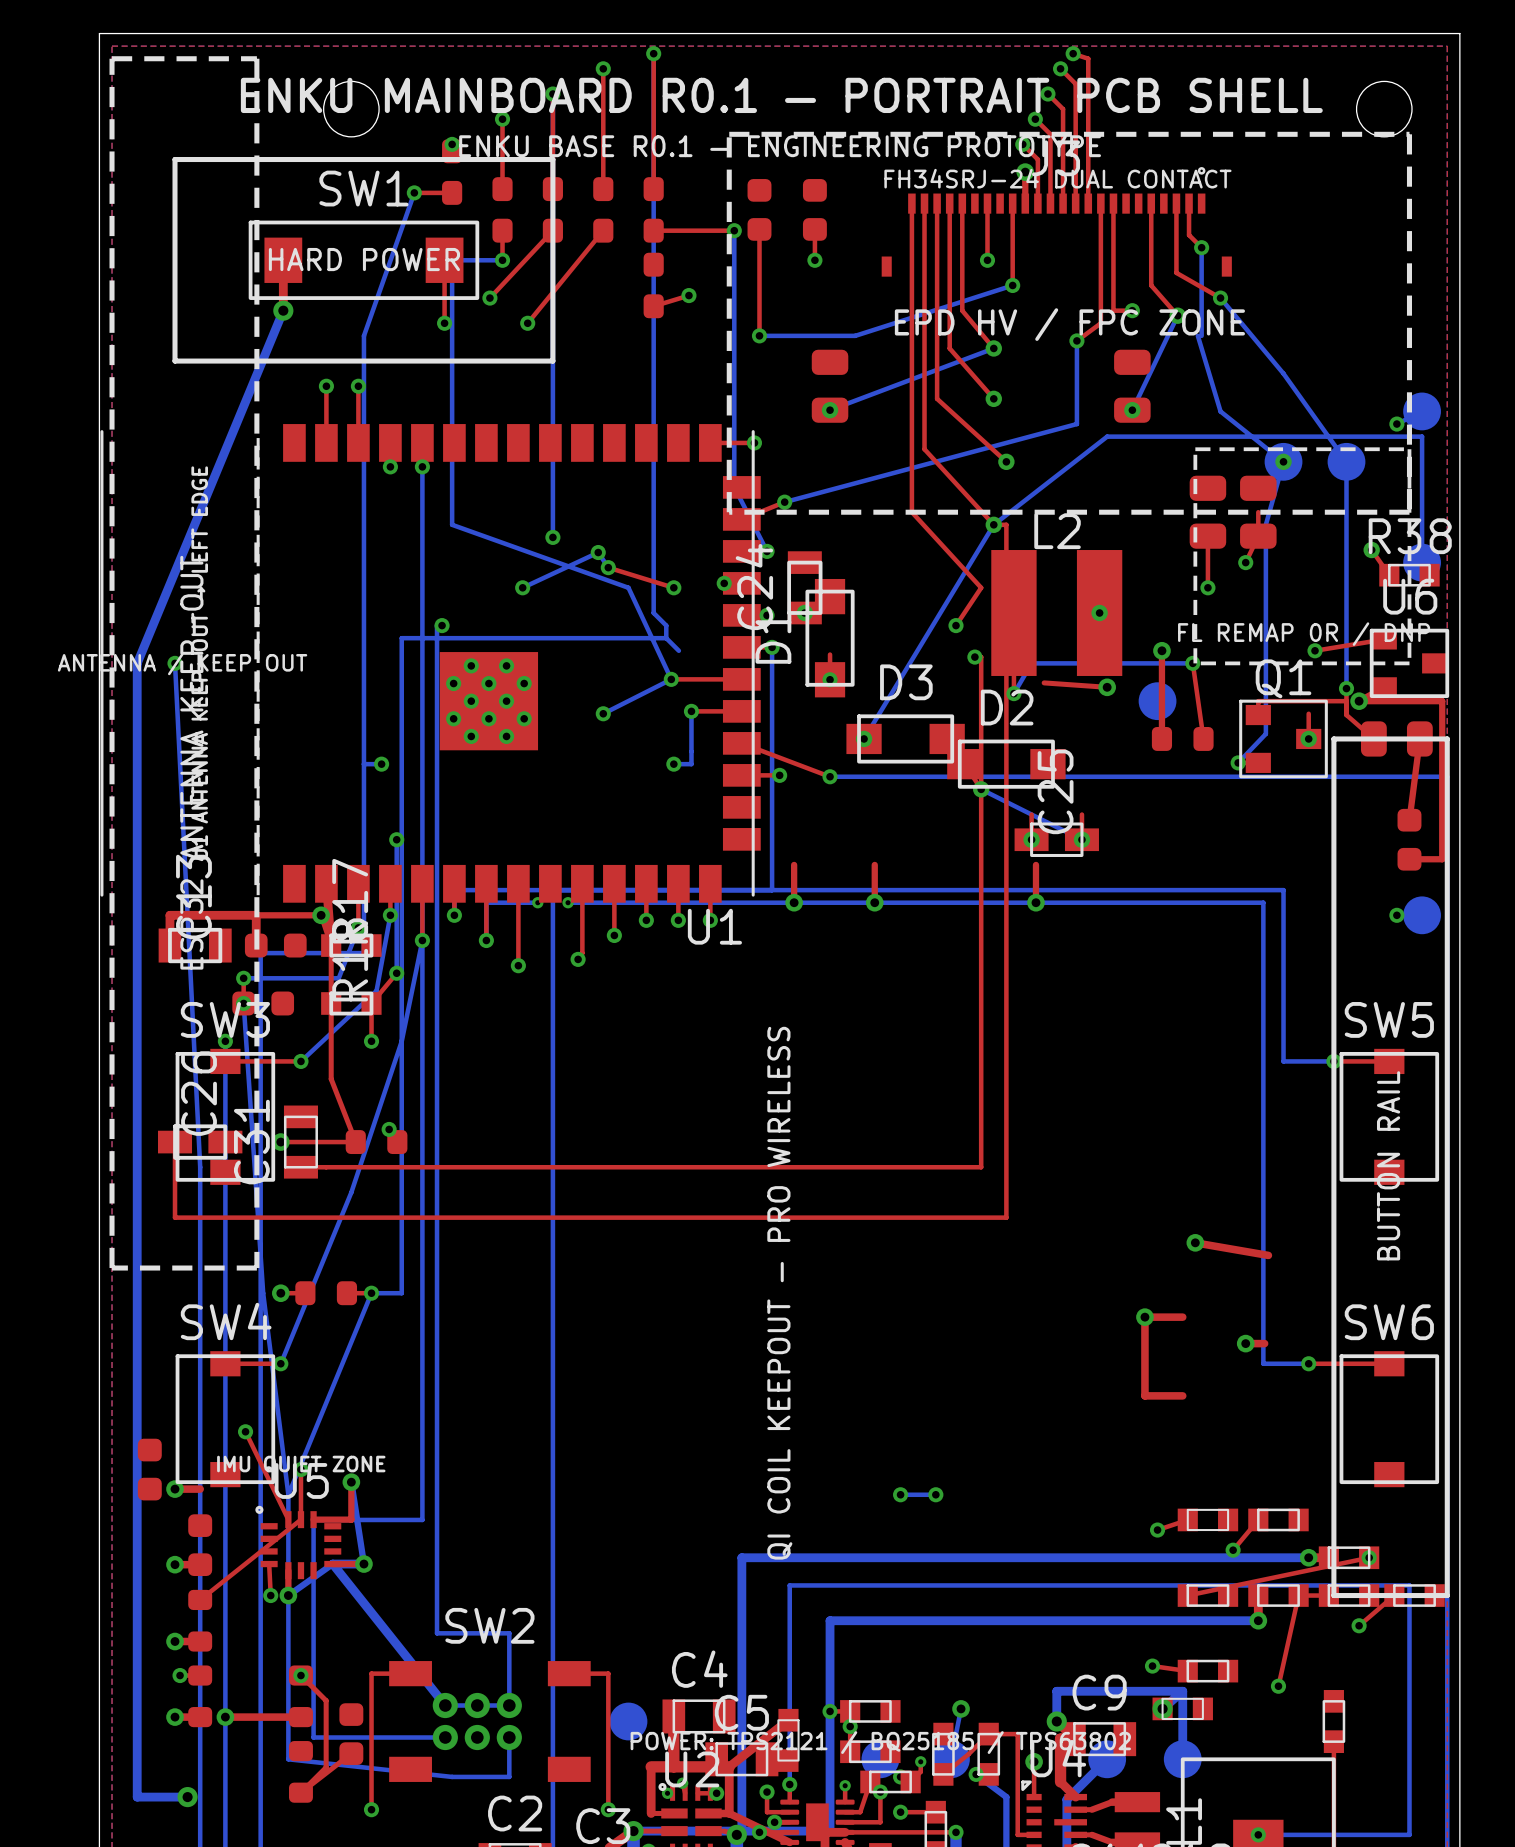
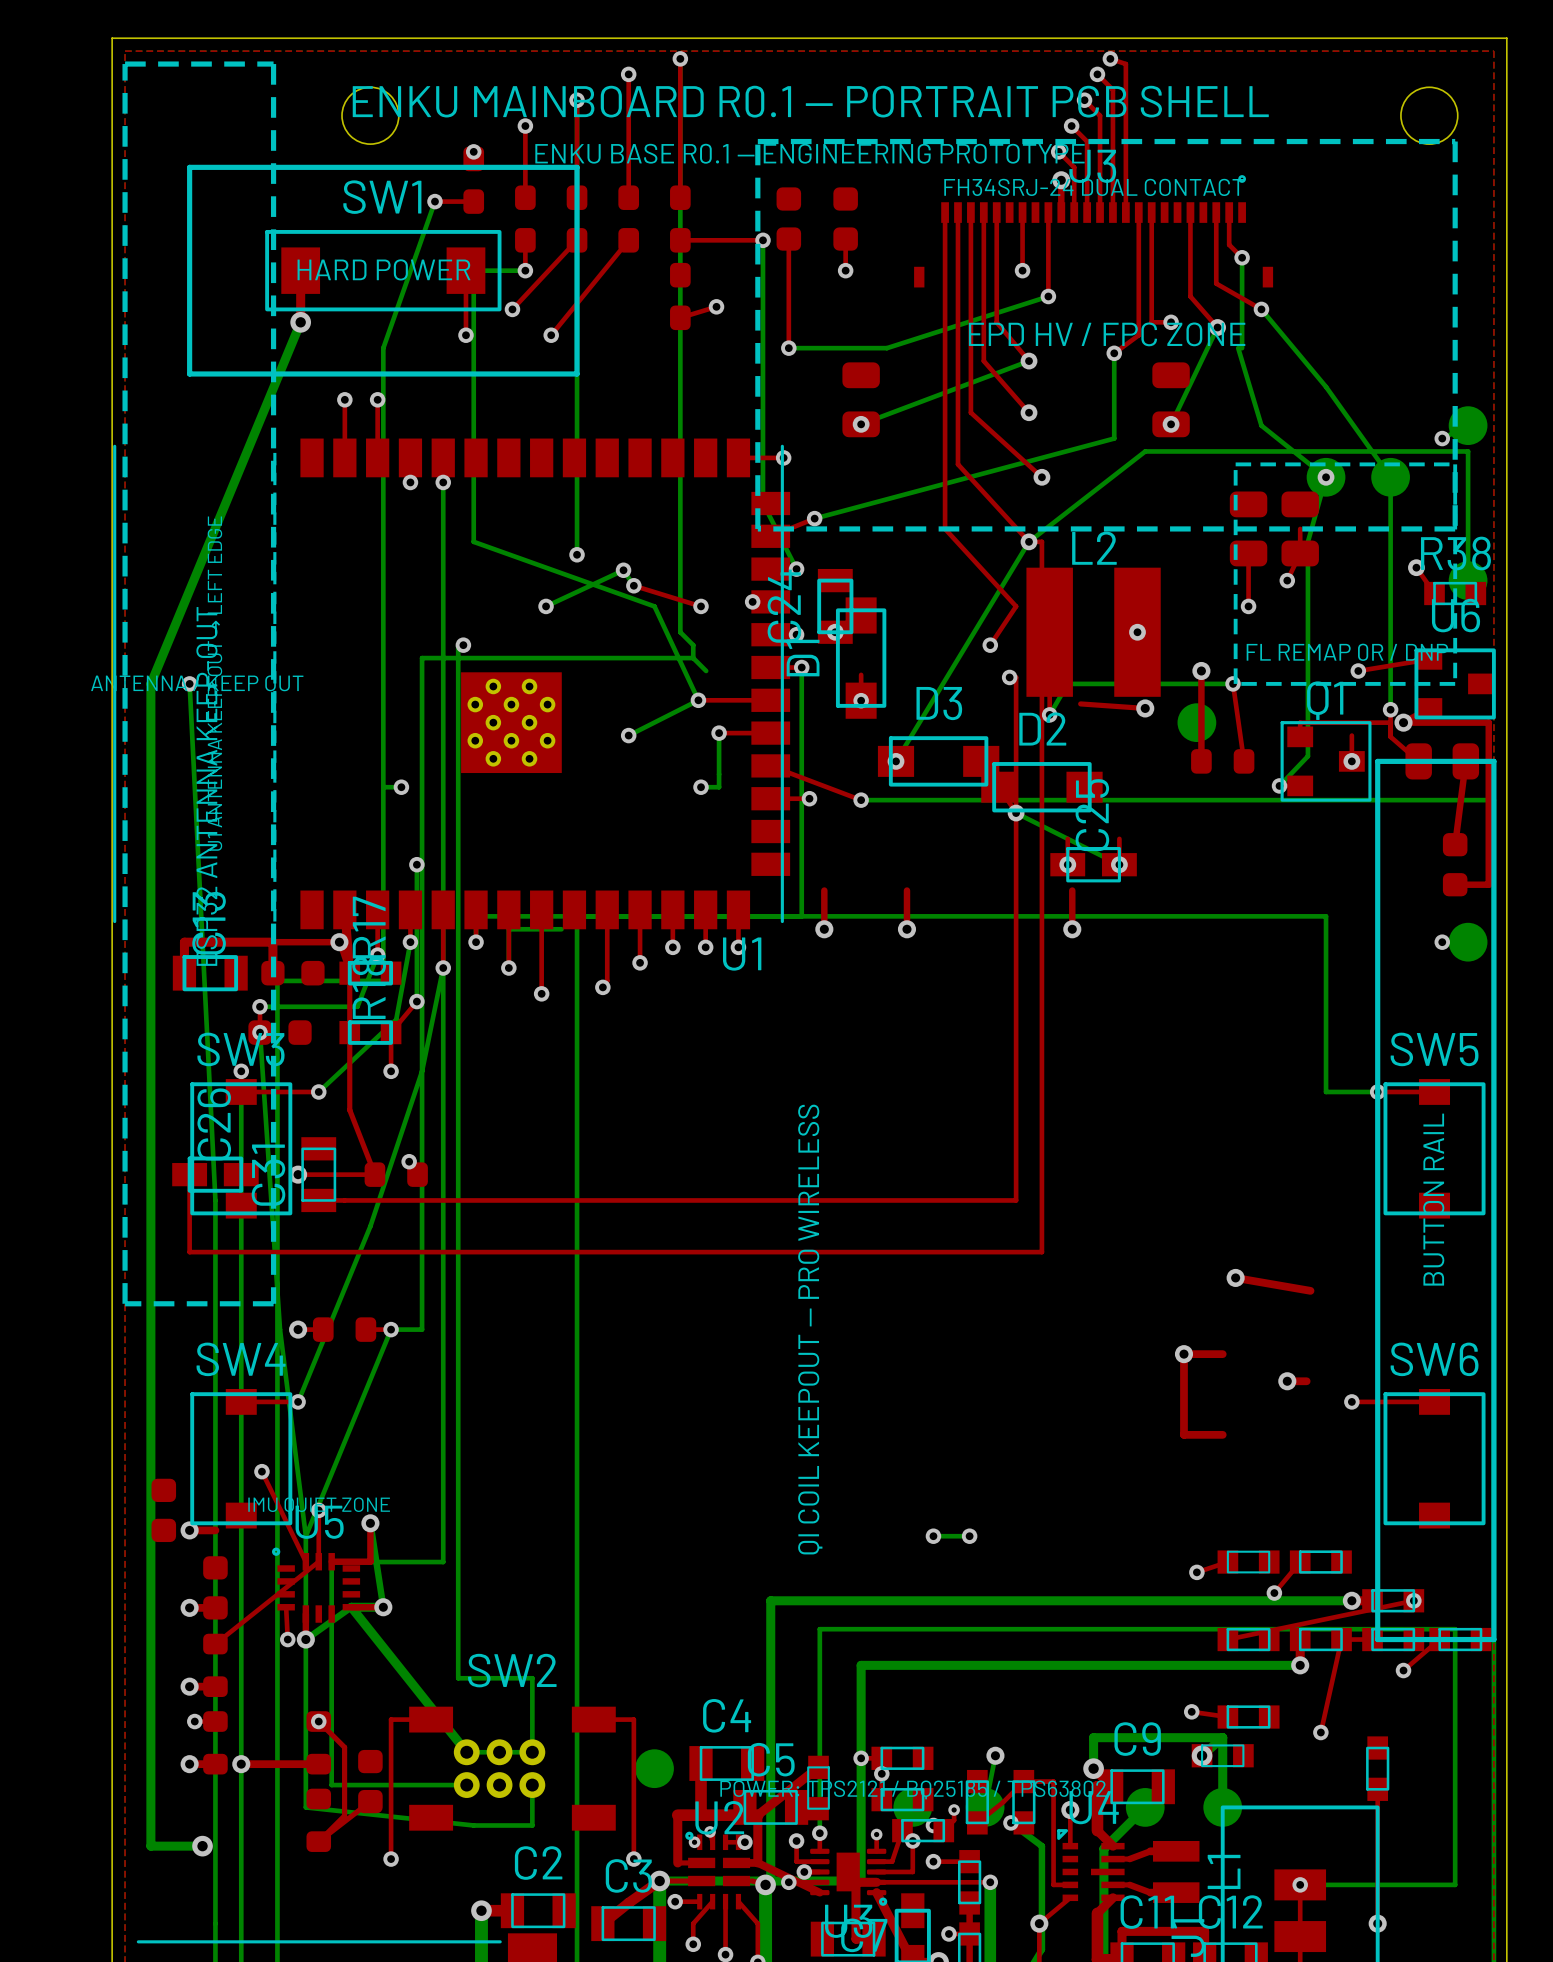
via: (537, 902) -> none
bottom track: (568, 902) (1263, 902) (1263, 1363) (1308, 1363) -> none
via: (568, 902) -> none

